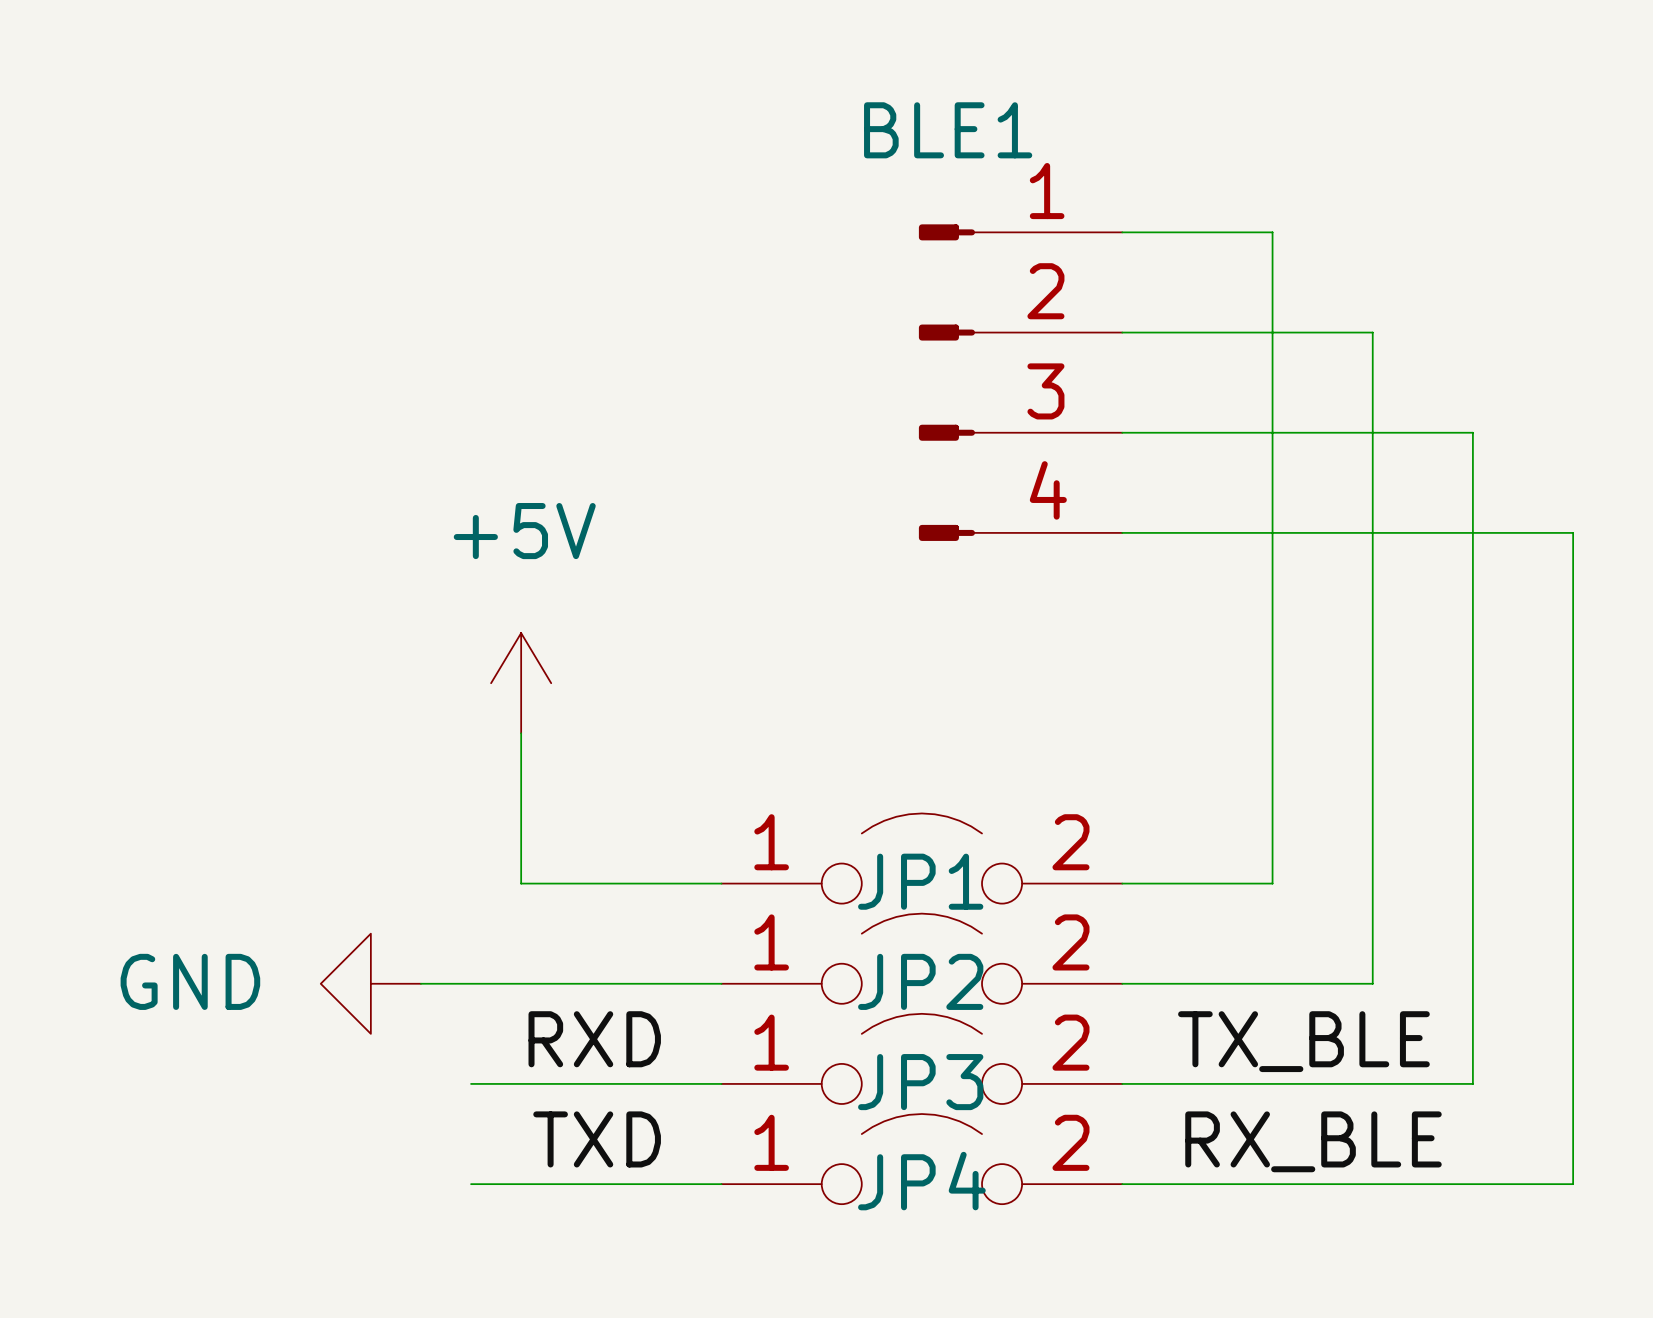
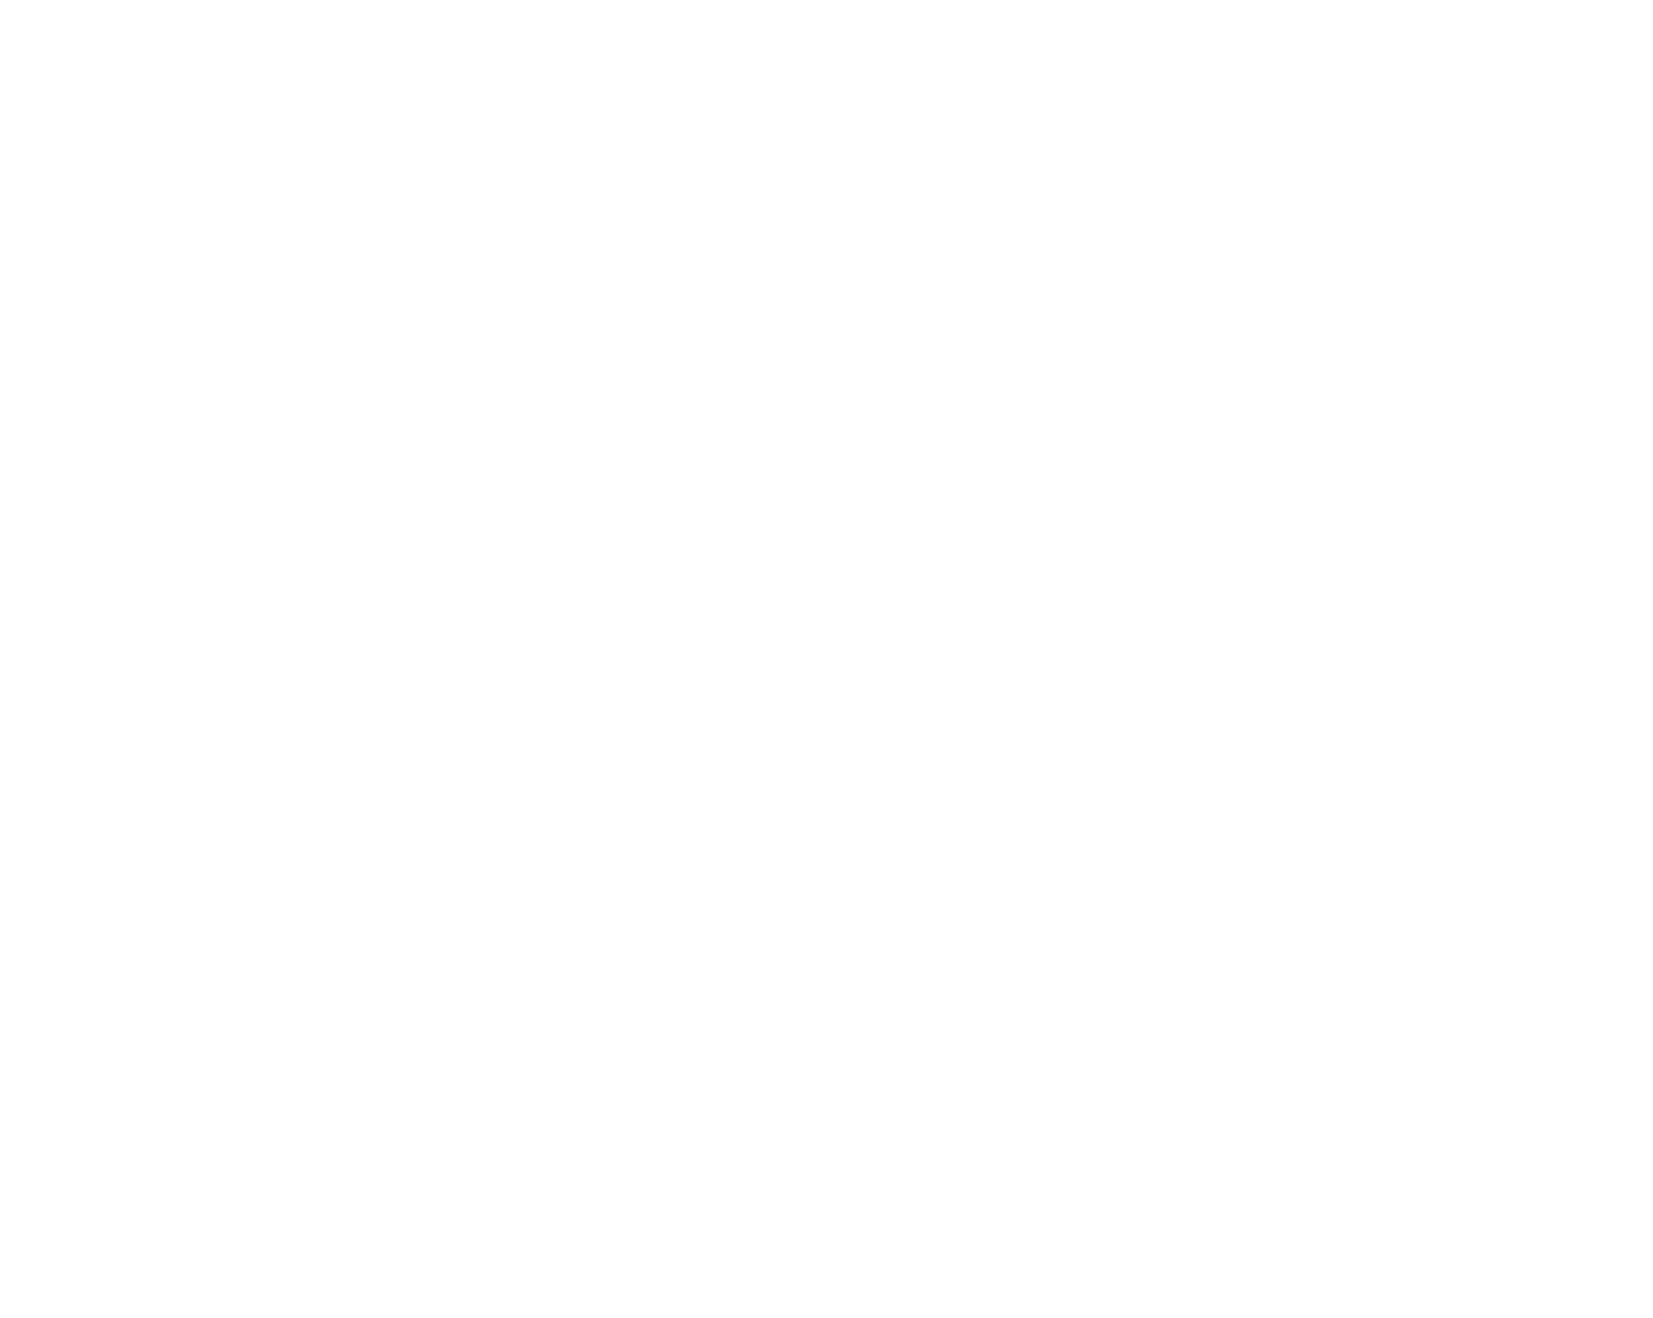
wire: (1122, 232) (1272, 232) (1272, 883) (1122, 883) -> none
wire: (1122, 332) (1372, 332) (1372, 983) (1122, 983) -> none
BLE1: (1020, 382) -> none
wire: (1122, 432) (1472, 432) (1472, 1083) (1122, 1083) -> none
wire: (1122, 532) (1573, 532) (1573, 1184) (1122, 1184) -> none
power symbol: +5V (521, 683) -> none
wire: (521, 733) (521, 883) (721, 883) -> none
JP1: (921, 858) -> none
JP2: (921, 958) -> none
power symbol: GND (370, 983) -> none
wire: (420, 983) (721, 983) -> none
label: RXD (594, 1039) -> none
label: TX_BLE (1303, 1041) -> none
JP3: (921, 1058) -> none
wire: (471, 1083) (721, 1083) -> none
label: TXD (597, 1139) -> none
label: RX_BLE (1313, 1141) -> none
JP4: (921, 1159) -> none
wire: (471, 1184) (721, 1184) -> none

